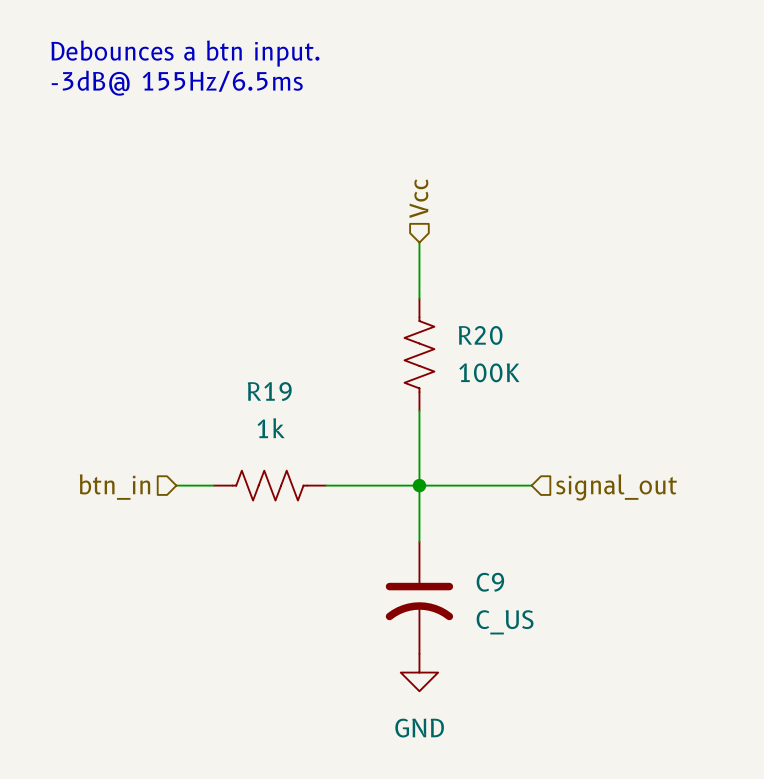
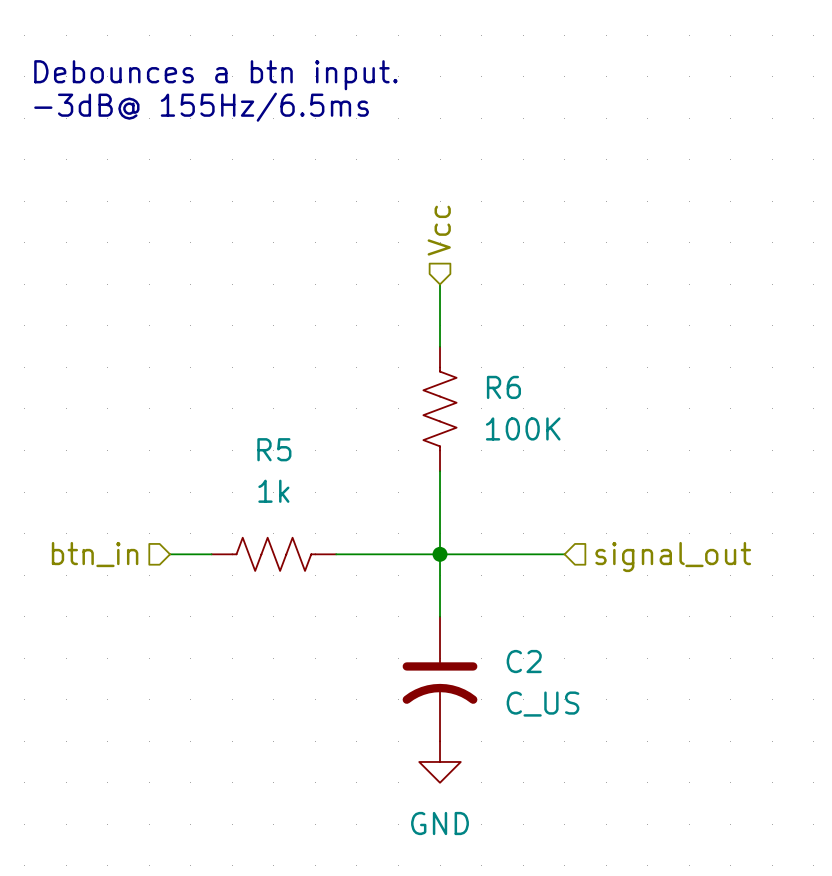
R20 name: R20 (480, 335) -> R6 (503, 387)
R19 name: R19 (269, 391) -> R5 (274, 449)
C9 name: C9 (490, 582) -> C2 (524, 661)

